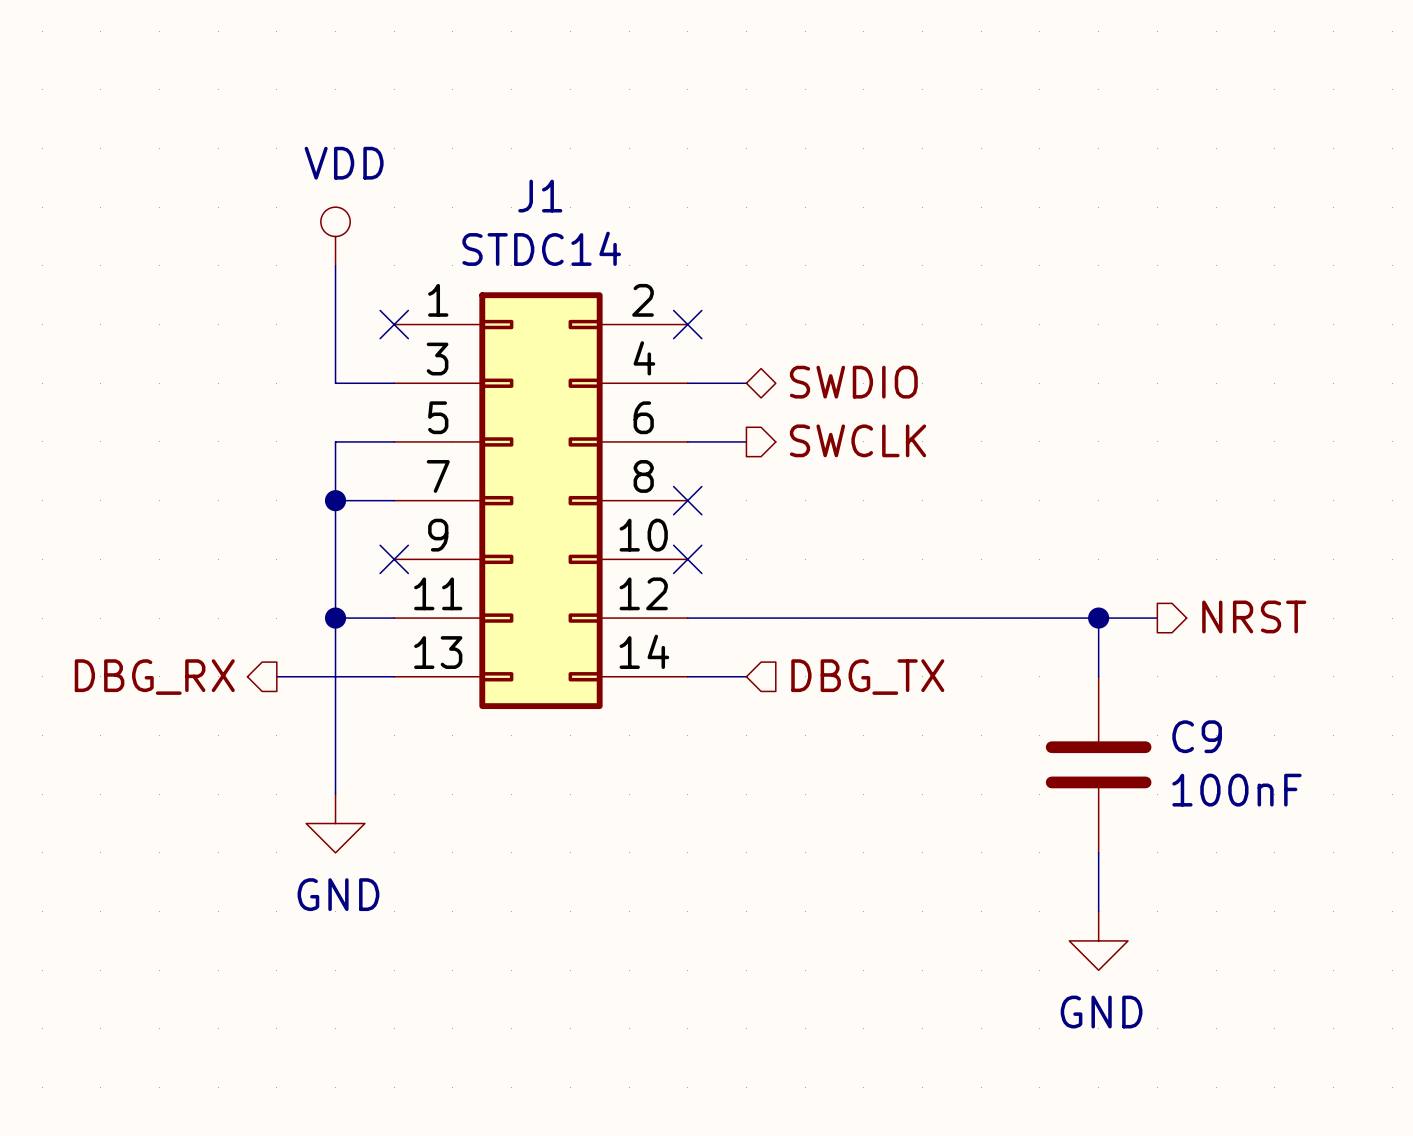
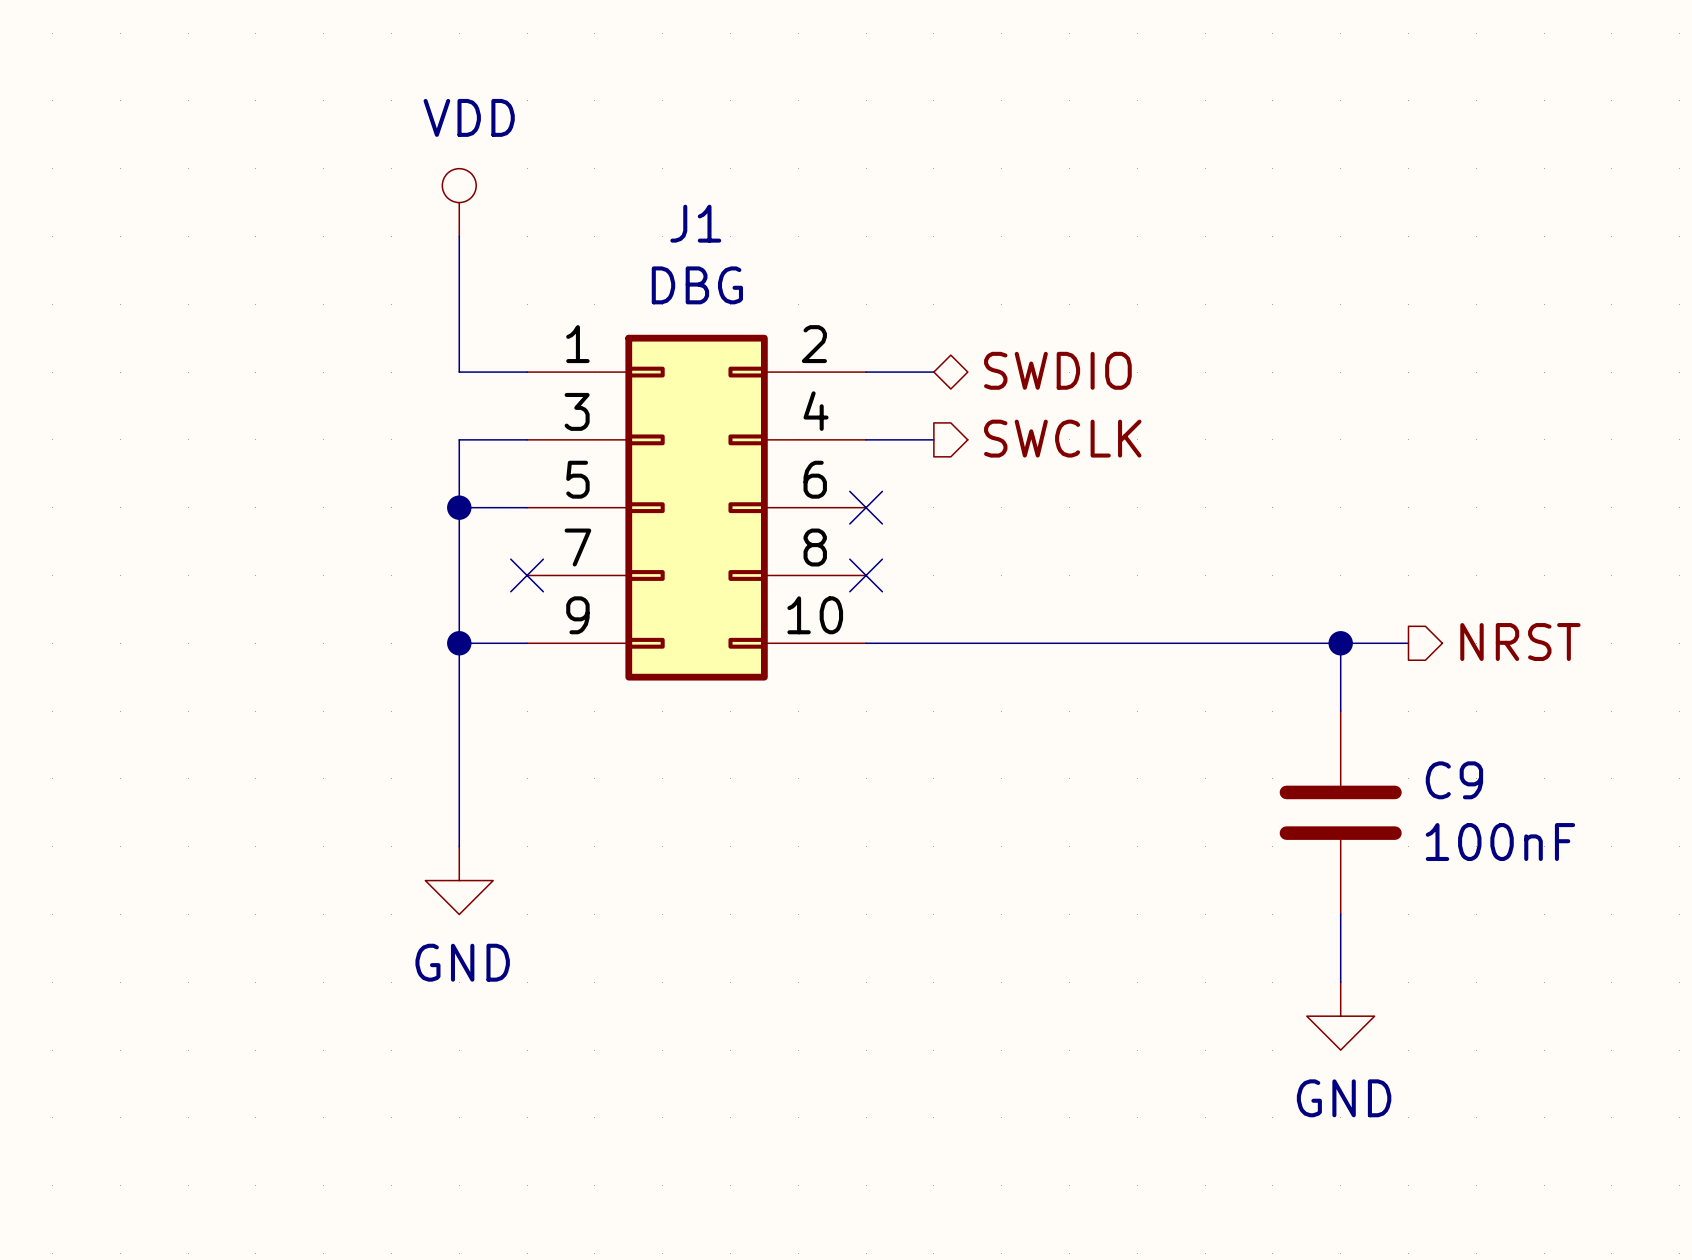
J1 name position: J1 (540, 196) -> J1 (695, 223)
J1 value: STDC14 (541, 248) -> DBG (697, 285)
J1 symbol: [394, 292, 688, 710] -> [527, 334, 867, 681]
no-connect mark: (394, 324) -> none
no-connect mark: (687, 324) -> none
wire: (276, 676) (394, 676) -> none
wire: (687, 676) (746, 676) -> none
hierarchical label: DBG_RX (154, 677) -> none
hierarchical label: DBG_TX (867, 677) -> none

